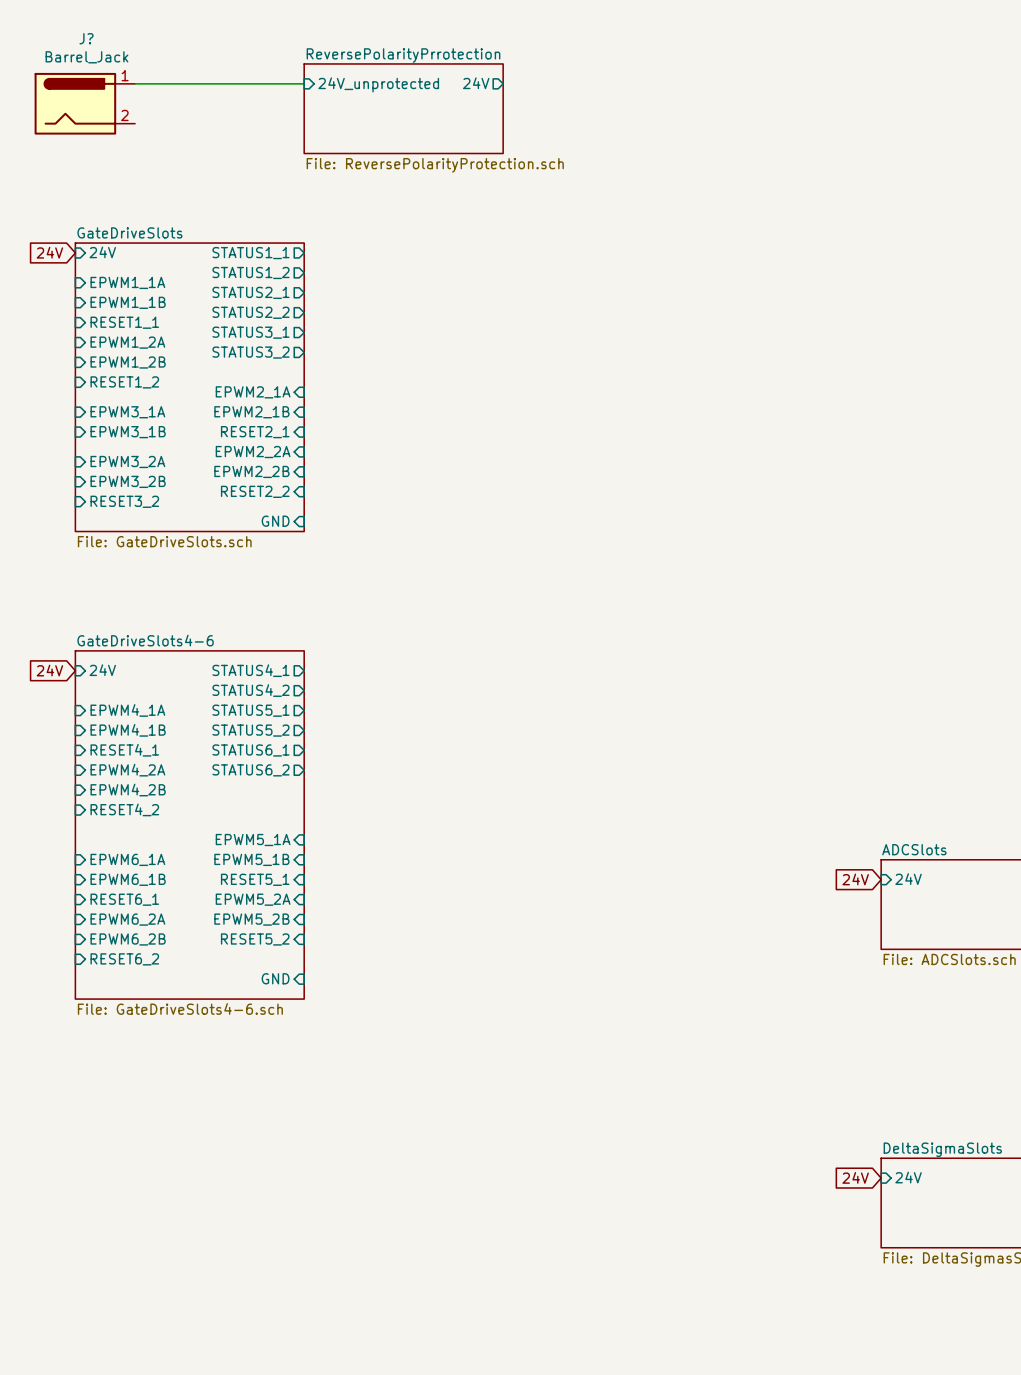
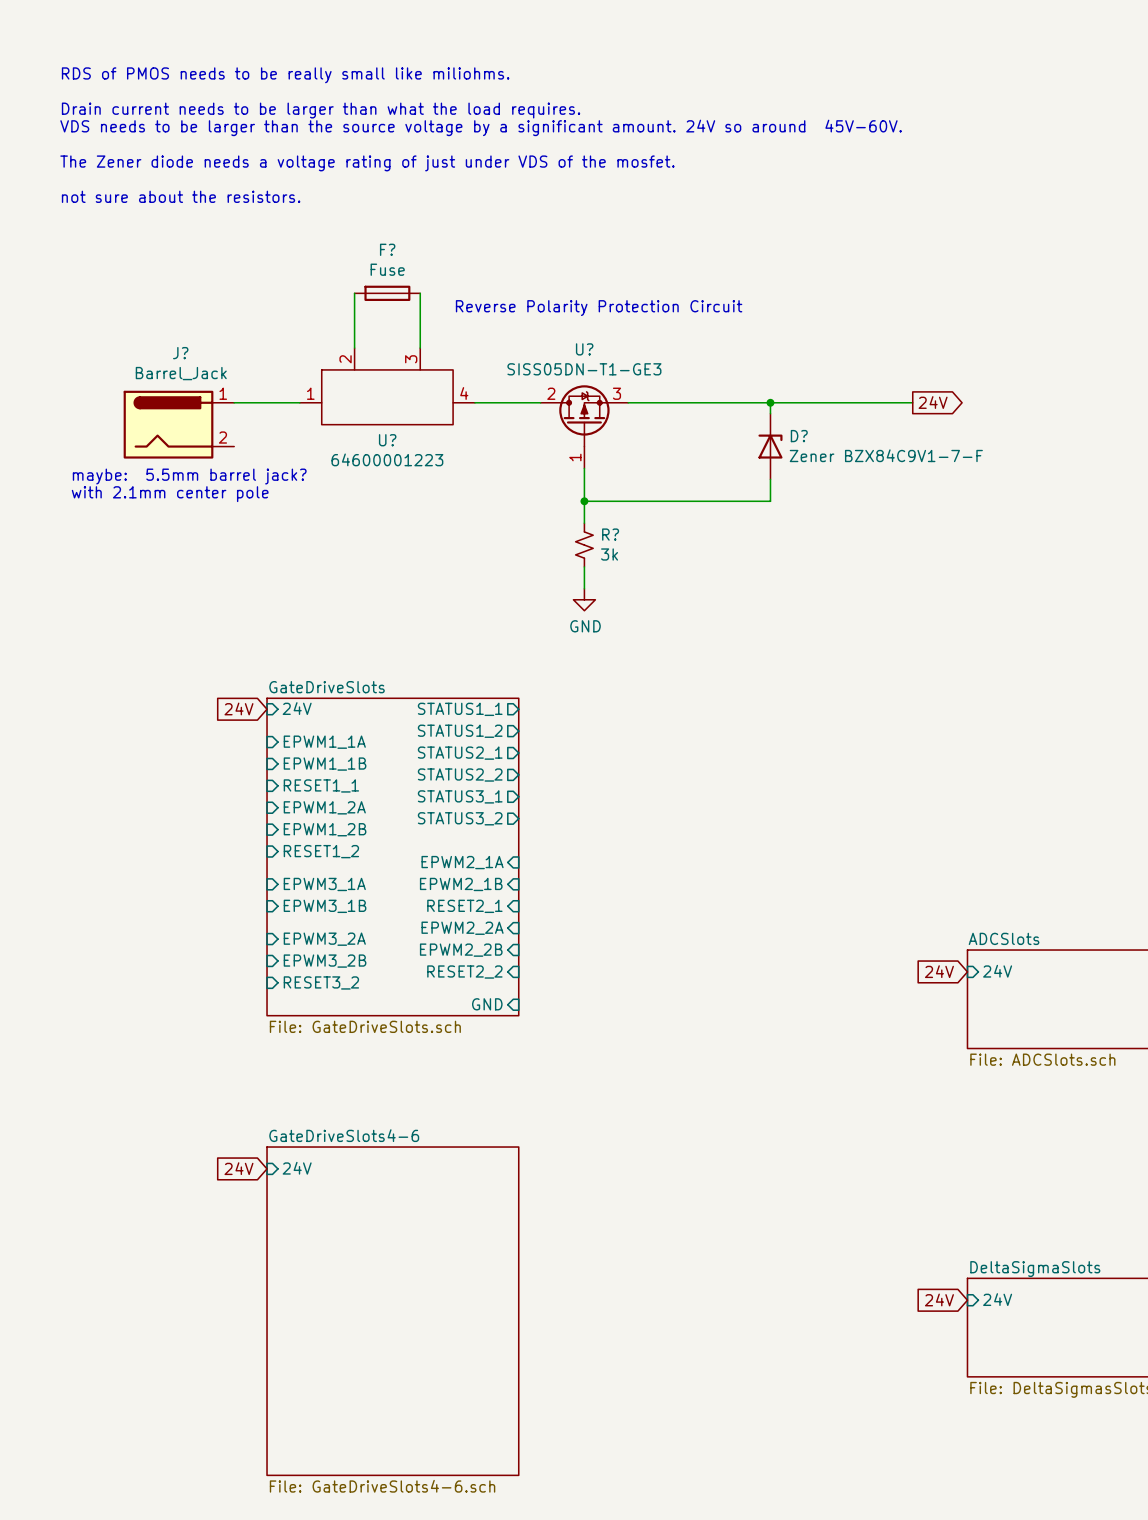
text: none -> RDS of PMOS needs to be really small like miliohms. (285, 75)
wire: (135, 83) (304, 83) -> none
sheet pin: 24V (476, 83) -> none
sheet pin: 24V_unprotected (378, 84) -> none
text: none -> Drain current needs to be larger than what the load requires. (321, 110)
J?: Barrel_Jack (84, 103) -> none
sheet ReversePolarityPrrotection: File: ReversePolarityProtection.sch (403, 108) -> none
text: none -> VDS needs to be larger than the source voltage by a significant amount. 24V so around 45V-60V. (481, 127)
text: none -> The Zener diode needs a voltage rating of just under VDS of the mosfet. (367, 163)
text: none -> not sure about the resistors. (181, 196)
global label: 24V (49, 252) -> none
sheet pin: 24V (102, 252) -> none
sheet pin: STATUS1_1 (250, 253) -> none
wire: none -> (354, 293) (354, 348)
F?: none -> Fuse (387, 293)
wire: none -> (420, 293) (420, 348)
sheet pin: STATUS1_2 (250, 272) -> none
text: none -> Reverse Polarity Protection Circuit (599, 308)
sheet pin: EPWM1_1A (127, 282) -> none
sheet pin: STATUS2_1 (250, 292) -> none
sheet pin: EPWM1_1B (128, 302) -> none
sheet pin: STATUS2_2 (250, 312) -> none
sheet pin: RESET1_1 (124, 322) -> none
sheet pin: STATUS3_1 (250, 332) -> none
sheet pin: EPWM1_2A (127, 342) -> none
U?: none -> 64600001223 (387, 386)
sheet pin: STATUS3_2 (250, 352) -> none
sheet pin: EPWM1_2B (128, 362) -> none
wire: none -> (234, 402) (299, 402)
wire: none -> (474, 402) (540, 402)
wire: none -> (628, 402) (912, 402)
wire: none -> (770, 402) (770, 413)
junction: none -> (770, 402)
global label: none -> 24V (933, 402)
sheet pin: RESET1_2 (124, 382) -> none
J?: none -> Barrel_Jack (178, 424)
U?: none -> SISS05DN-T1-GE3 (584, 426)
sheet GateDriveSlots: File: GateDriveSlots.sch (189, 387) -> none
sheet pin: EPWM2_1A (253, 392) -> none
D?: none -> Zener BZX84C9V1-7-F (770, 446)
sheet pin: EPWM3_1A (127, 412) -> none
sheet pin: EPWM2_1B (251, 412) -> none
wire: none -> (584, 468) (584, 523)
text: none -> maybe: 5.5mm barrel jack? (189, 476)
sheet pin: EPWM3_1B (128, 432) -> none
sheet pin: RESET2_1 (255, 432) -> none
wire: none -> (770, 479) (770, 501) (584, 501)
text: none -> with 2.1mm center pole (170, 494)
junction: none -> (584, 501)
sheet pin: EPWM2_2A (253, 452) -> none
sheet pin: EPWM3_2A (127, 461) -> none
sheet pin: EPWM2_2B (251, 471) -> none
sheet pin: EPWM3_2B (128, 481) -> none
sheet pin: RESET2_2 (255, 491) -> none
R?: none -> 3k (584, 545)
sheet pin: RESET3_2 (124, 501) -> none
wire: none -> (584, 566) (584, 588)
sheet pin: GND (275, 521) -> none
power symbol: none -> GND (584, 599)
sheet GateDriveSlots4-6 name position: GateDriveSlots4-6 (145, 640) -> GateDriveSlots4-6 (344, 1135)
sheet pin: none -> STATUS1_1 (460, 709)
sheet GateDriveSlots4-6 shape: [75, 650, 305, 1000] -> [267, 1147, 519, 1476]
sheet pin: none -> STATUS1_2 (460, 731)
global label position: 24V (49, 670) -> 24V (238, 708)
sheet pin position: 24V (102, 670) -> 24V (297, 708)
sheet pin: STATUS4_1 (250, 670) -> none
sheet pin: none -> EPWM1_1A (324, 742)
sheet pin: none -> STATUS2_1 (460, 753)
sheet pin: STATUS4_2 (250, 690) -> none
sheet pin: none -> EPWM1_1B (325, 764)
sheet pin: none -> STATUS2_2 (460, 775)
sheet pin: EPWM4_1A (127, 710) -> none
sheet pin: STATUS5_1 (250, 710) -> none
sheet pin: none -> RESET1_1 (321, 785)
sheet pin: none -> STATUS3_1 (460, 796)
sheet pin: EPWM4_1B (128, 730) -> none
sheet pin: STATUS5_2 (250, 730) -> none
sheet pin: none -> EPWM1_2A (324, 807)
sheet pin: none -> STATUS3_2 (460, 818)
sheet pin: RESET4_1 (124, 750) -> none
sheet pin: STATUS6_1 (250, 750) -> none
sheet pin: none -> EPWM1_2B (325, 829)
sheet pin: EPWM4_2A (127, 770) -> none
sheet pin: STATUS6_2 (250, 770) -> none
sheet pin: none -> RESET1_2 (321, 851)
sheet GateDriveSlots: none -> File: GateDriveSlots.sch (392, 856)
sheet pin: none -> EPWM2_1A (462, 862)
sheet pin: EPWM4_2B (128, 790) -> none
sheet pin: none -> EPWM3_1A (324, 884)
sheet pin: none -> EPWM2_1B (461, 884)
sheet pin: RESET4_2 (124, 809) -> none
sheet pin: none -> EPWM3_1B (325, 906)
sheet pin: none -> RESET2_1 (464, 906)
sheet pin: EPWM5_1A (253, 840) -> none
sheet pin: none -> EPWM2_2A (462, 928)
sheet pin: none -> EPWM3_2A (324, 939)
sheet pin: EPWM6_1A (127, 859) -> none
sheet pin: EPWM5_1B (251, 859) -> none
sheet pin: none -> EPWM2_2B (461, 950)
sheet pin: none -> EPWM3_2B (325, 961)
sheet pin: EPWM6_1B (128, 879) -> none
sheet pin: RESET5_1 (255, 879) -> RESET3_2 (321, 982)
sheet pin: none -> RESET2_2 (464, 972)
sheet pin: RESET6_1 (124, 899) -> none
sheet pin: EPWM5_2A (253, 899) -> none
sheet pin: EPWM6_2A (127, 919) -> none
sheet pin: EPWM5_2B (251, 919) -> none
sheet pin: EPWM6_2B (128, 939) -> none
sheet pin: RESET5_2 (255, 939) -> none
sheet pin: RESET6_2 (124, 959) -> none
sheet pin position: GND (275, 978) -> GND (487, 1004)
sheet GateDriveSlots4-6 value position: File: GateDriveSlots4-6.sch (180, 1008) -> File: GateDriveSlots4-6.sch (382, 1486)
global label: none -> 24V (238, 1168)
sheet pin: none -> 24V (297, 1168)

